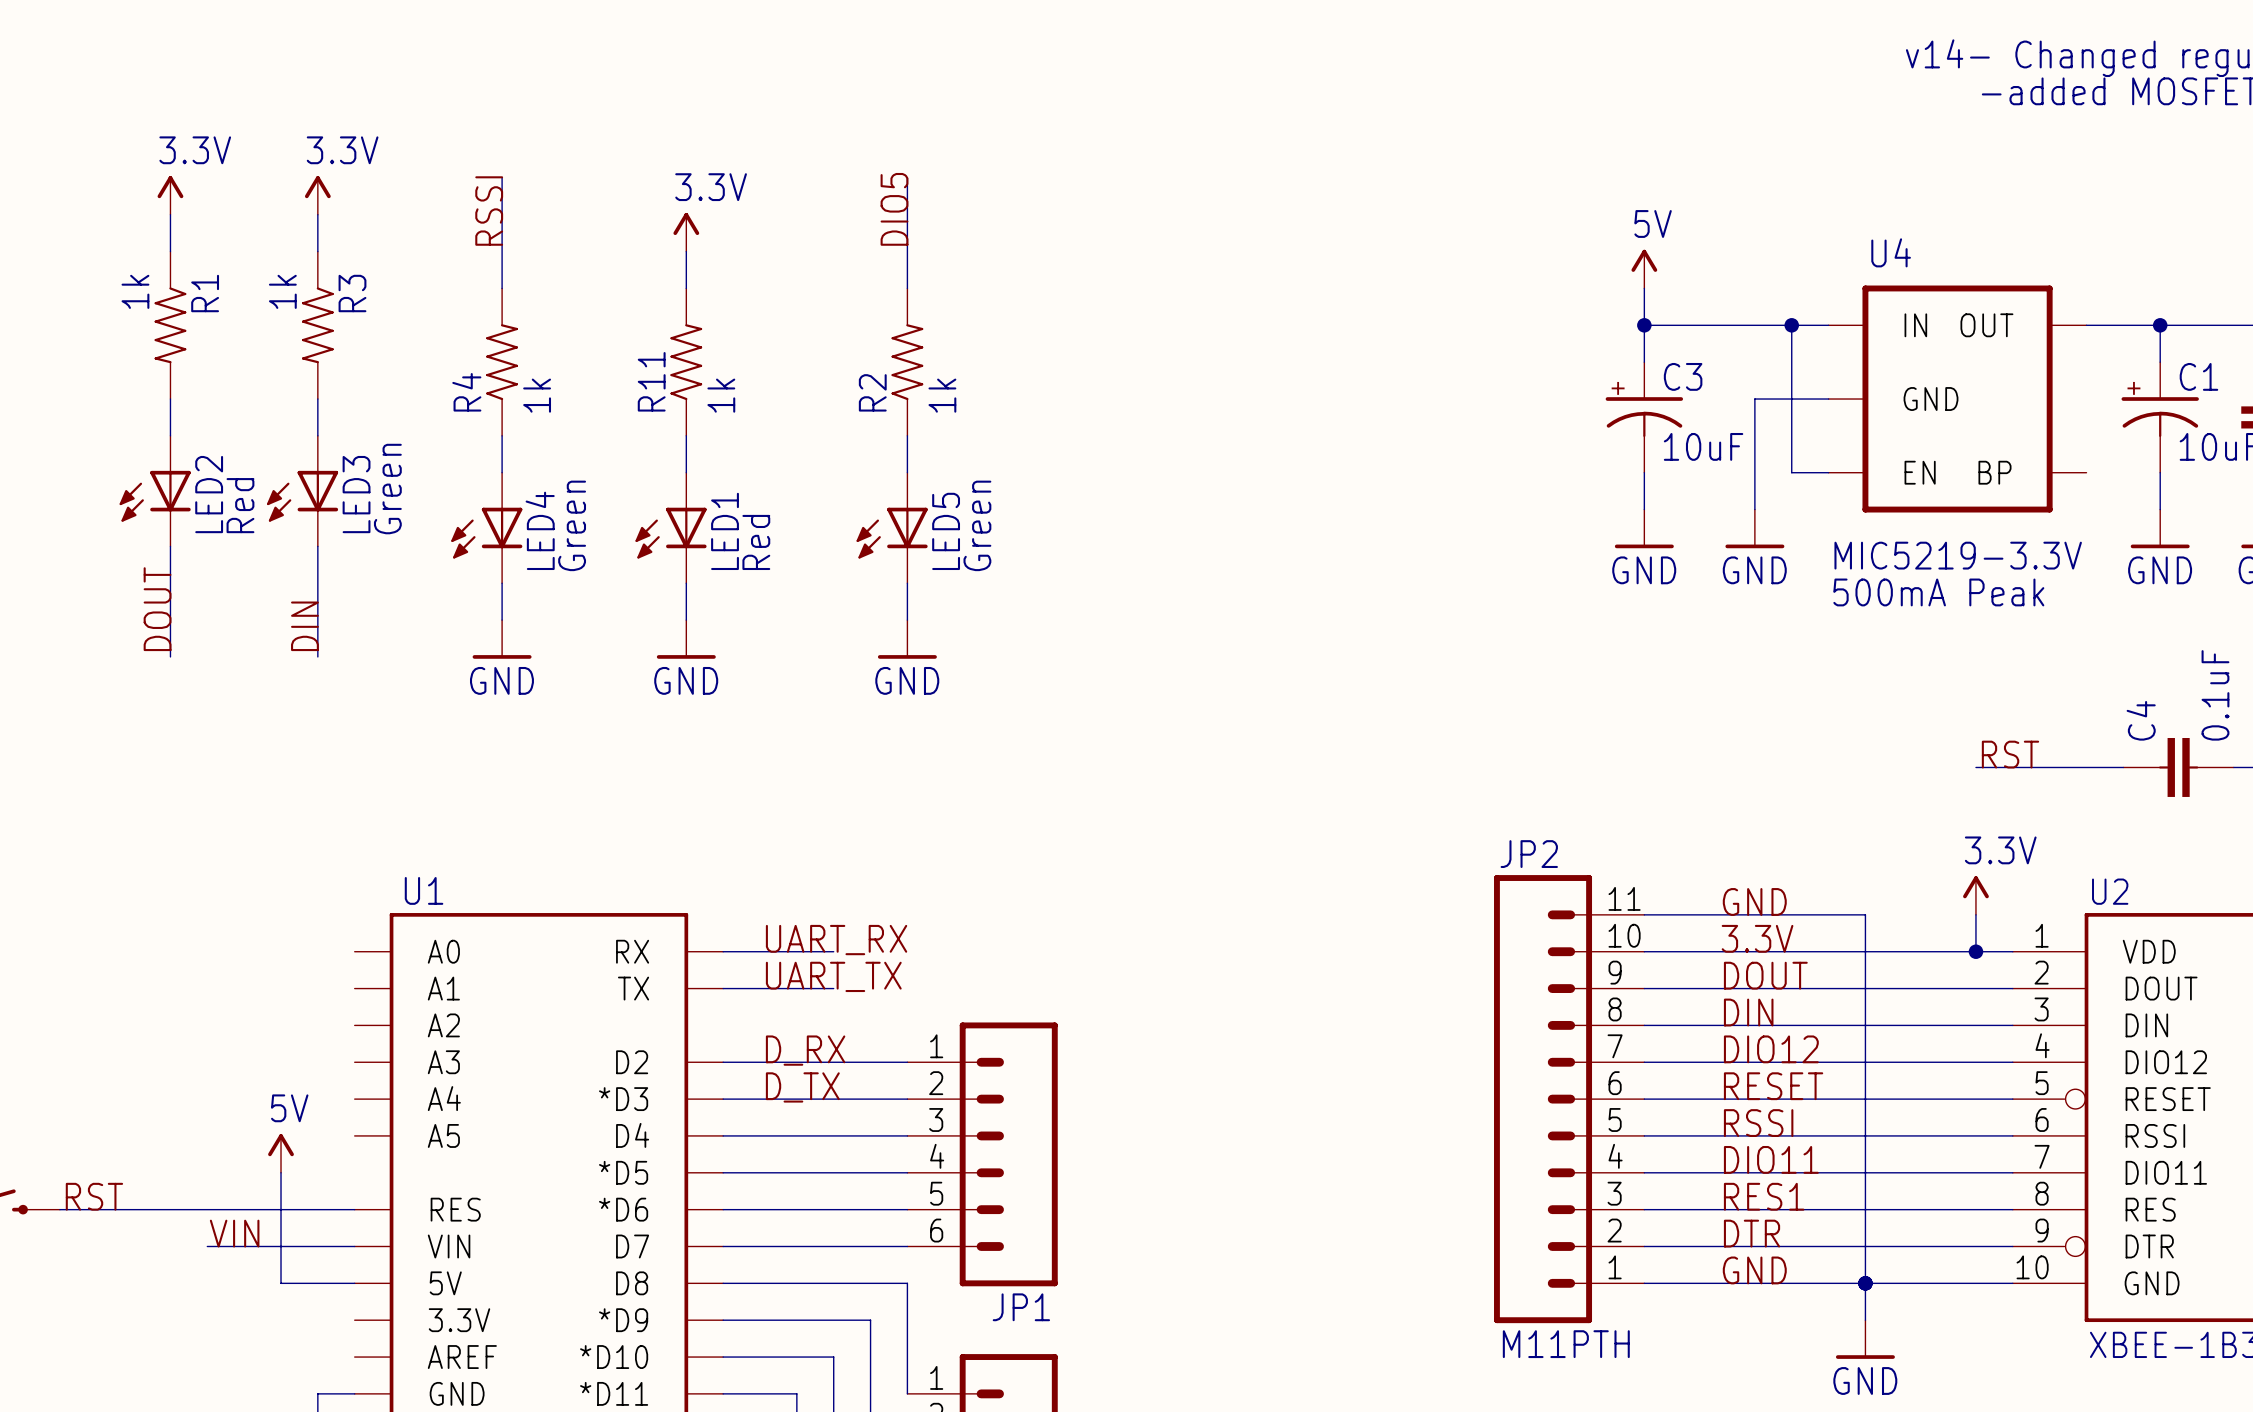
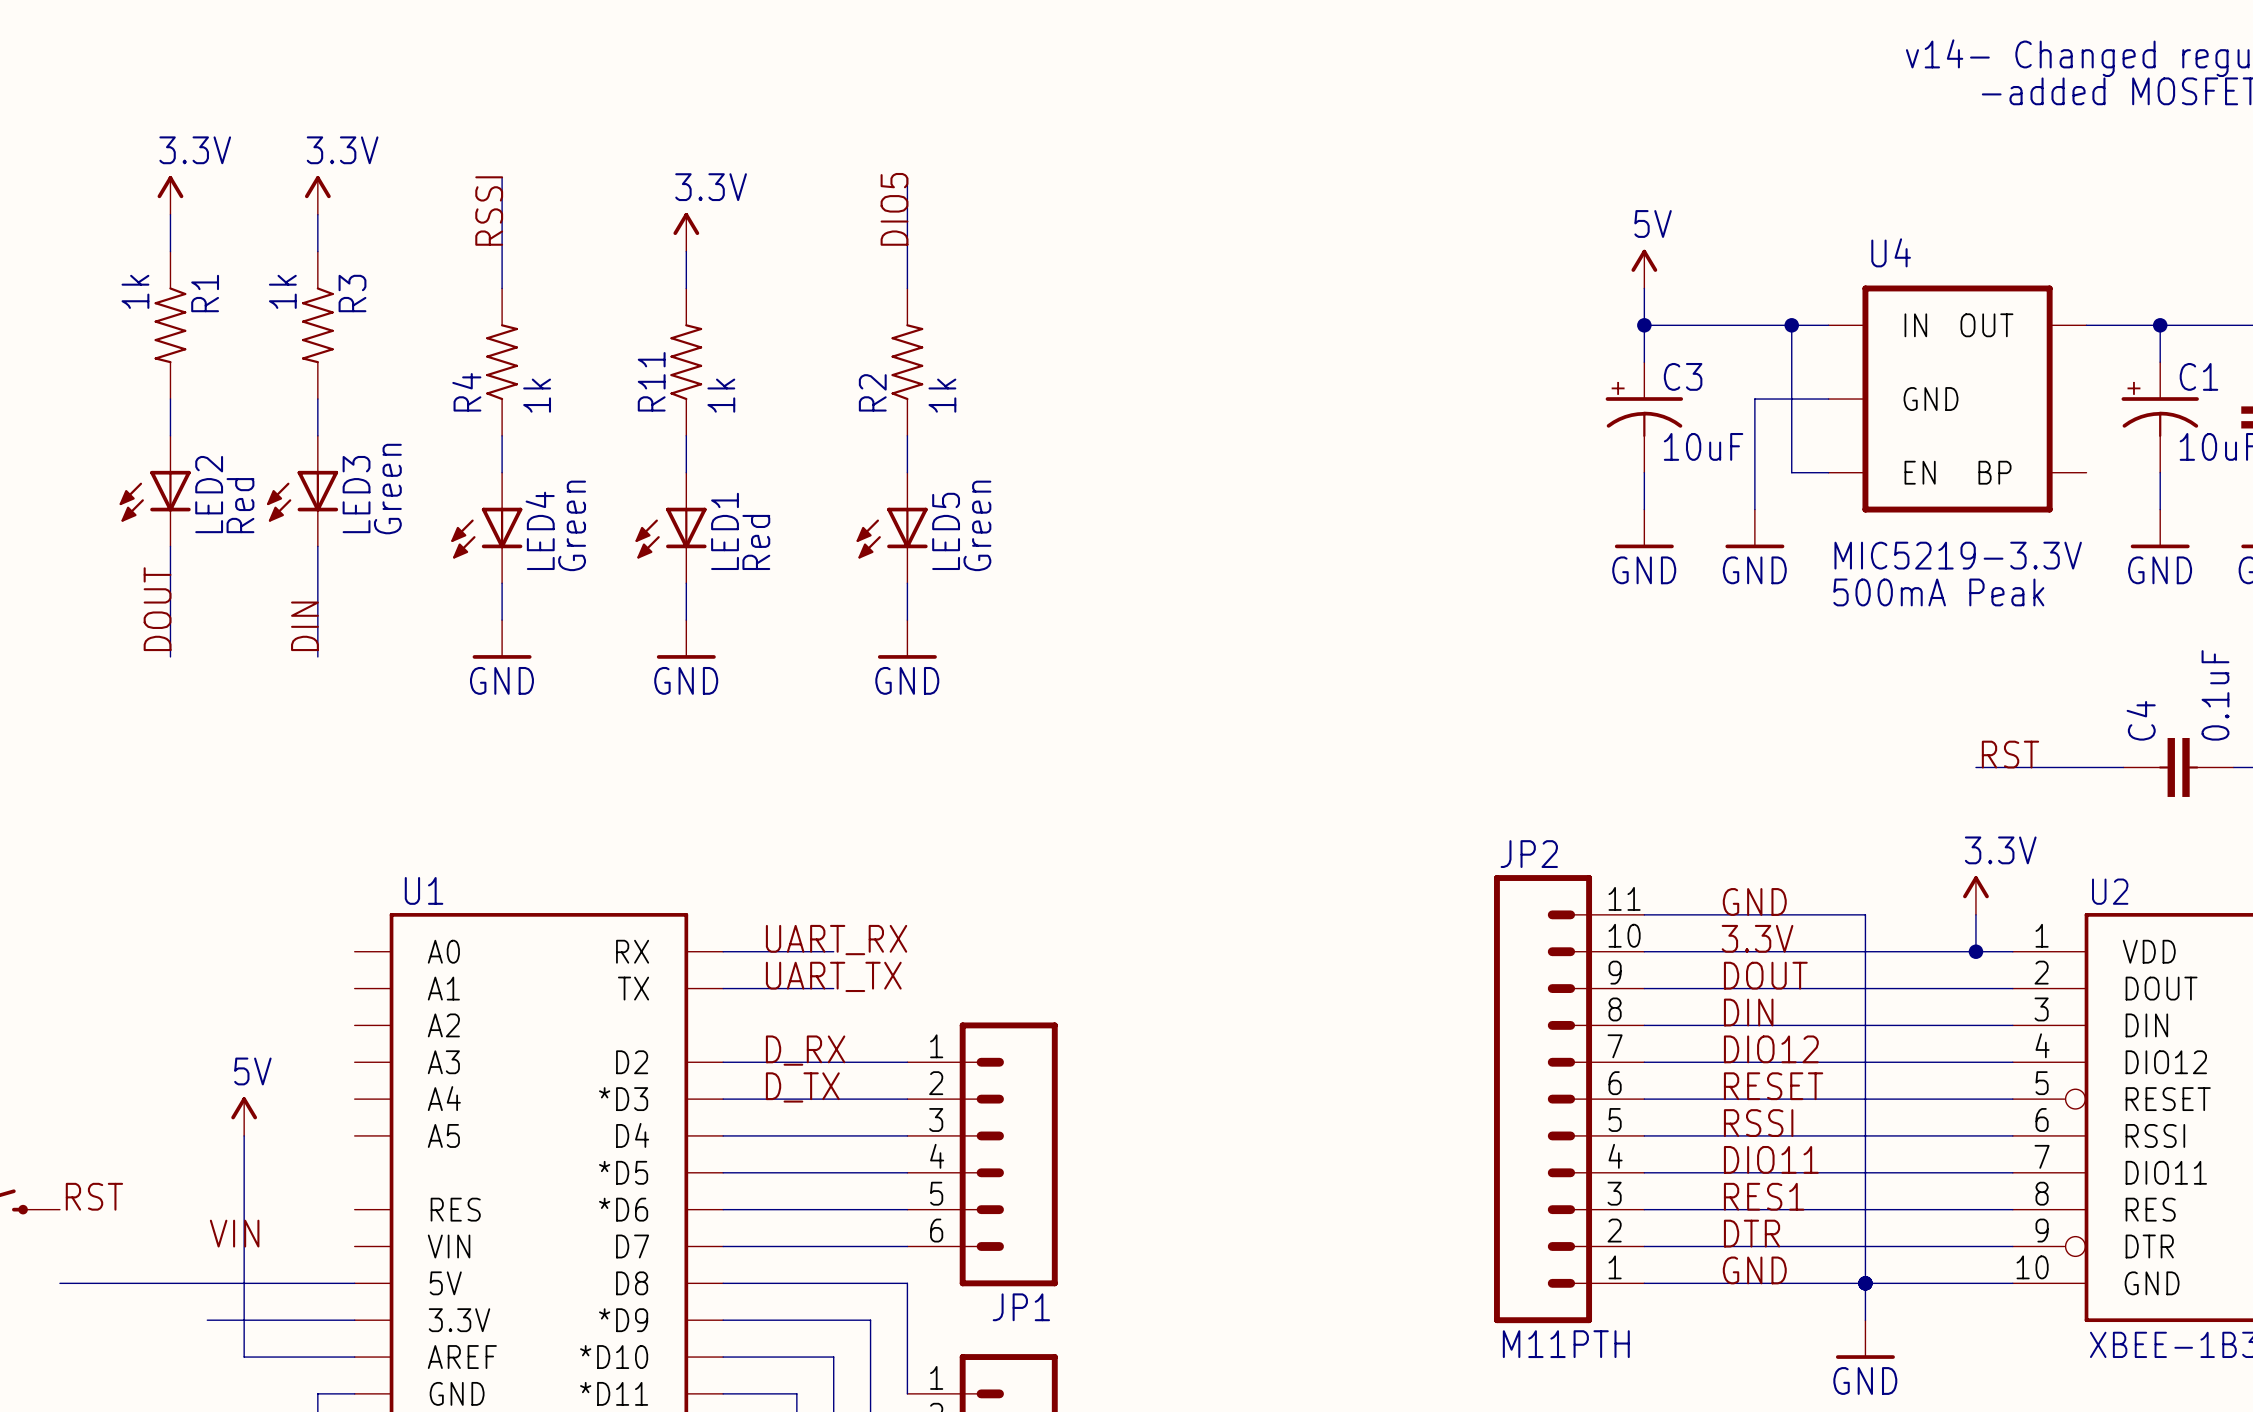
wire: none -> (244, 1135) (244, 1357) (354, 1357)
power symbol position: 5V (281, 1153) -> 5V (244, 1116)
wire: (281, 1172) (281, 1283) -> (59, 1283) (281, 1283)
wire: (59, 1209) (354, 1209) -> none
wire: (207, 1246) (354, 1246) -> (207, 1320) (354, 1320)

